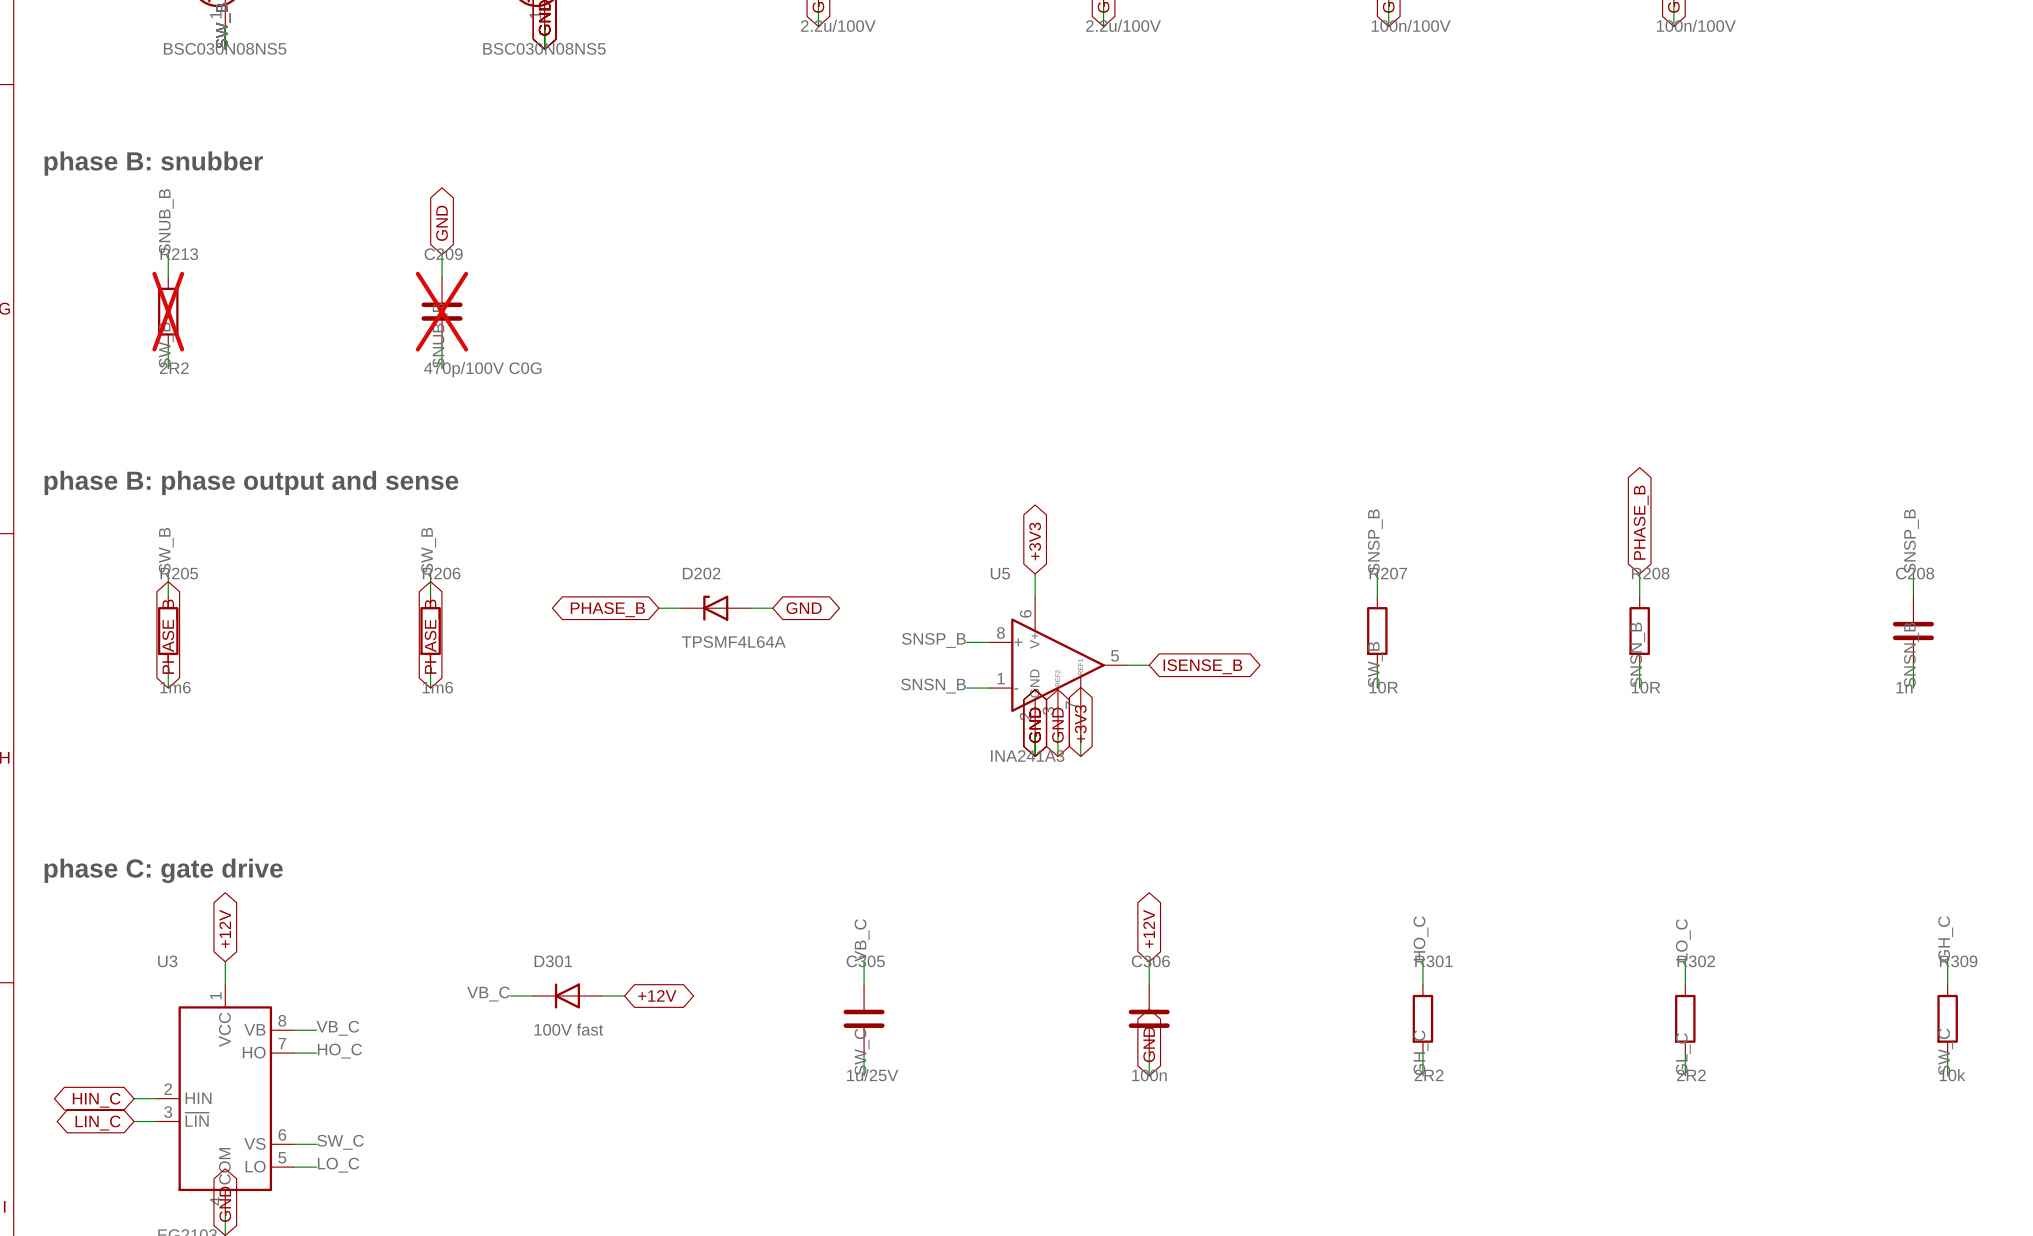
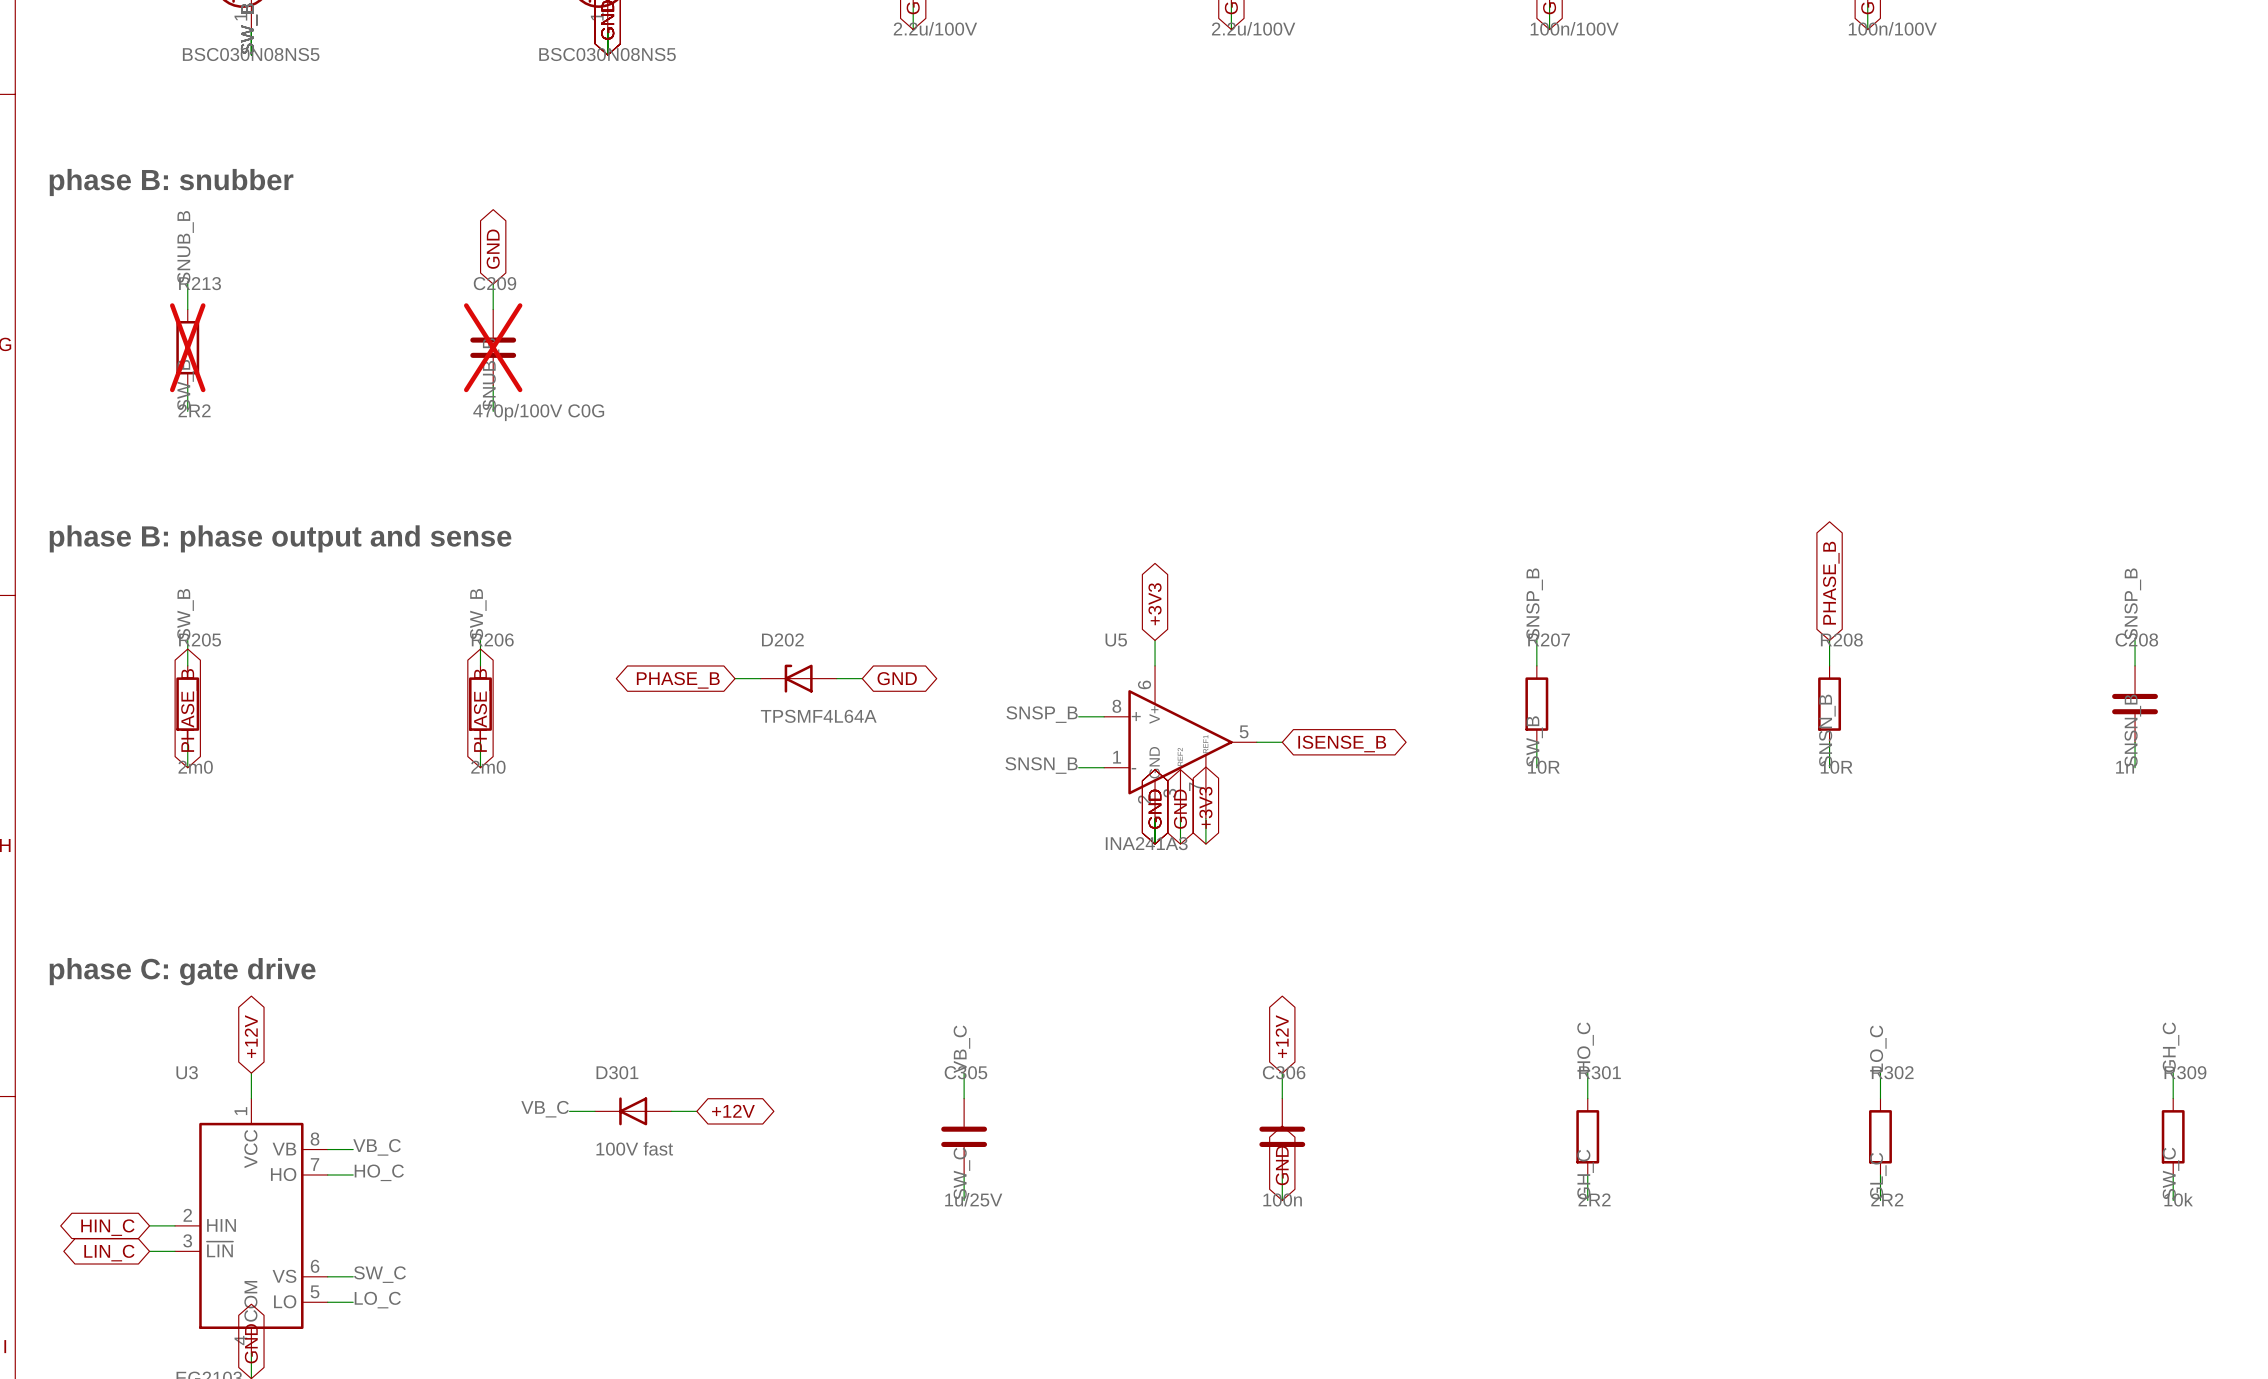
R205 value: 1m6 (175, 687) -> 2m0 (195, 767)
R206 value: 1m6 (437, 687) -> 2m0 (488, 767)

